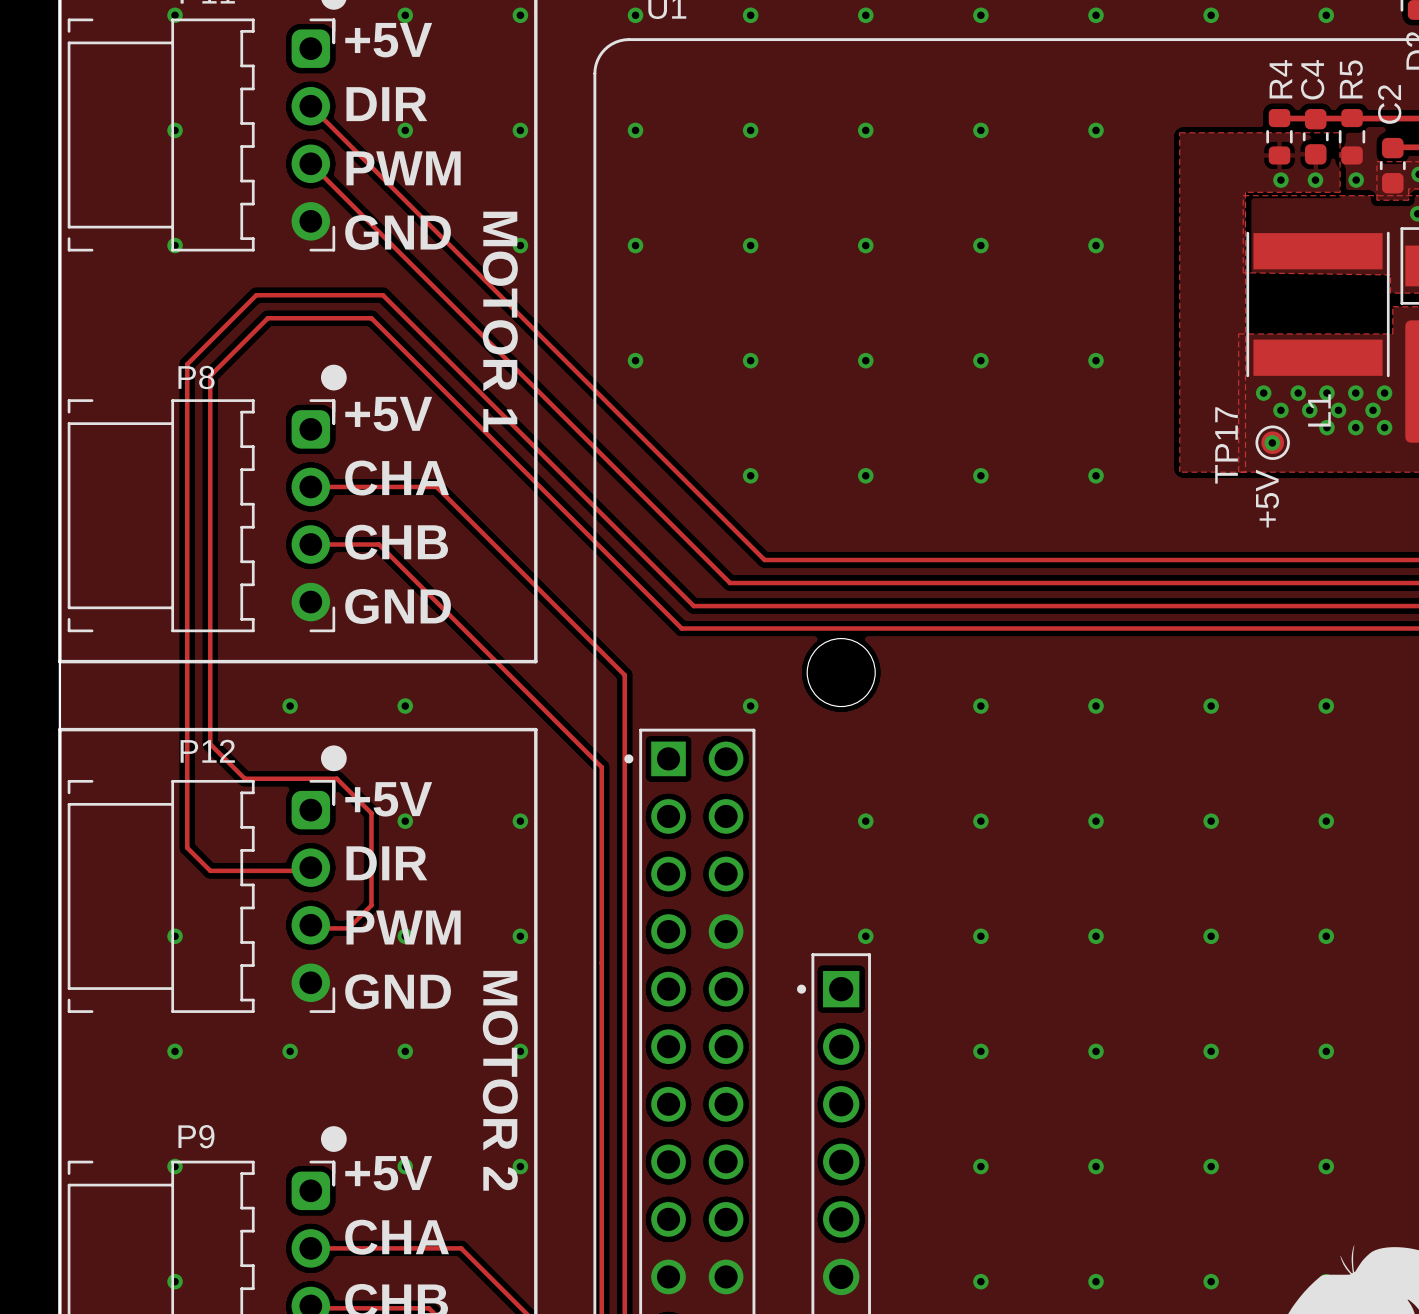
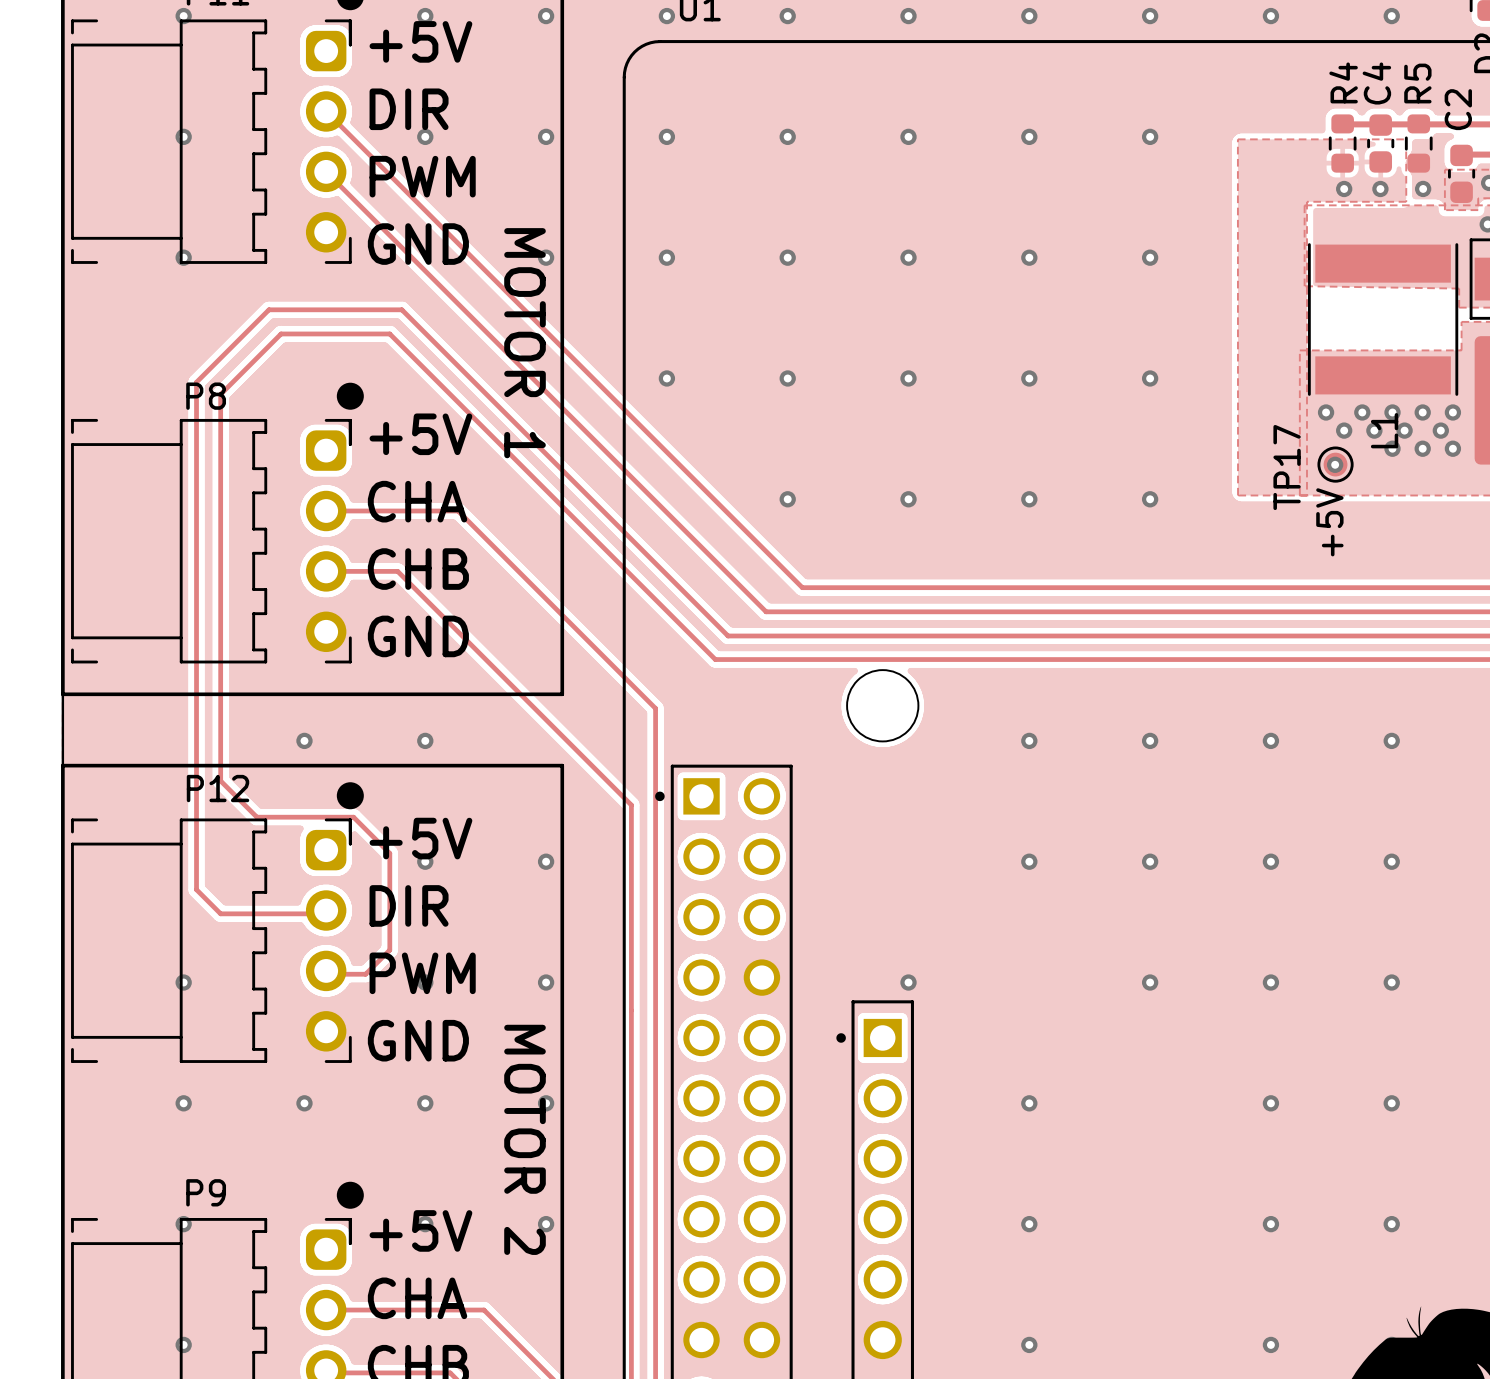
via: (750, 706) -> none
via: (865, 821) -> none
via: (980, 936) -> none
via: (1096, 1051) -> none
via: (1096, 1166) -> none
via: (1096, 1281) -> none

